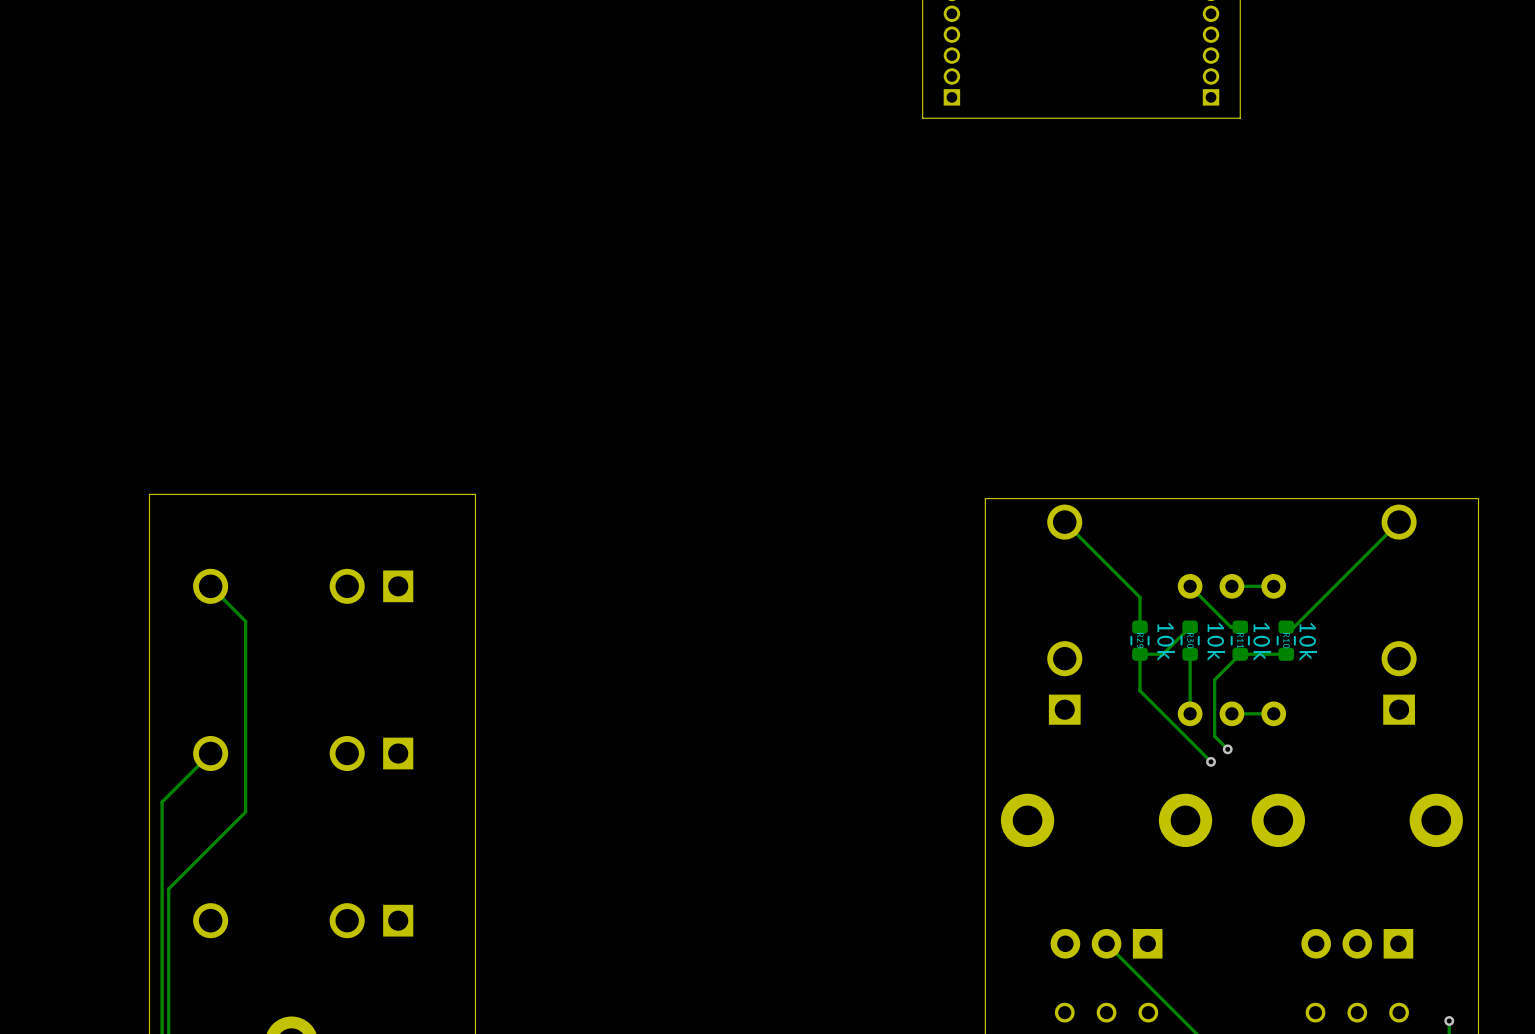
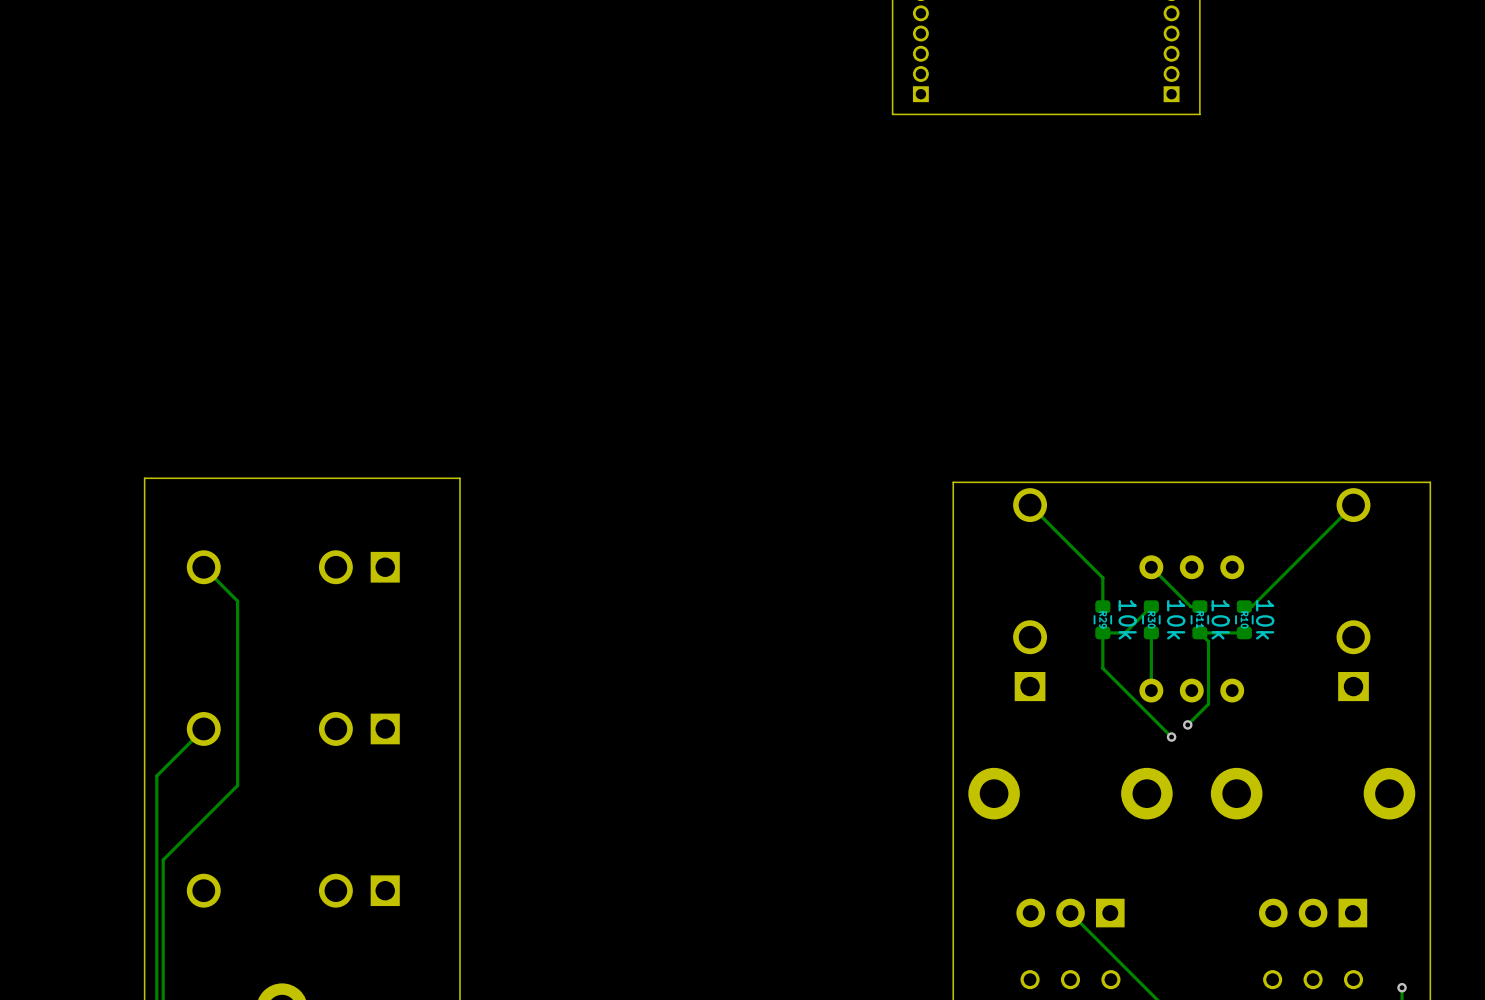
track: (1273, 586) (1231, 586) -> none
track: (1240, 654) (1214, 679) (1214, 736) (1227, 749) -> (1199, 632) (1208, 641) (1208, 704) (1187, 724)
track: (1273, 713) (1231, 713) -> none

